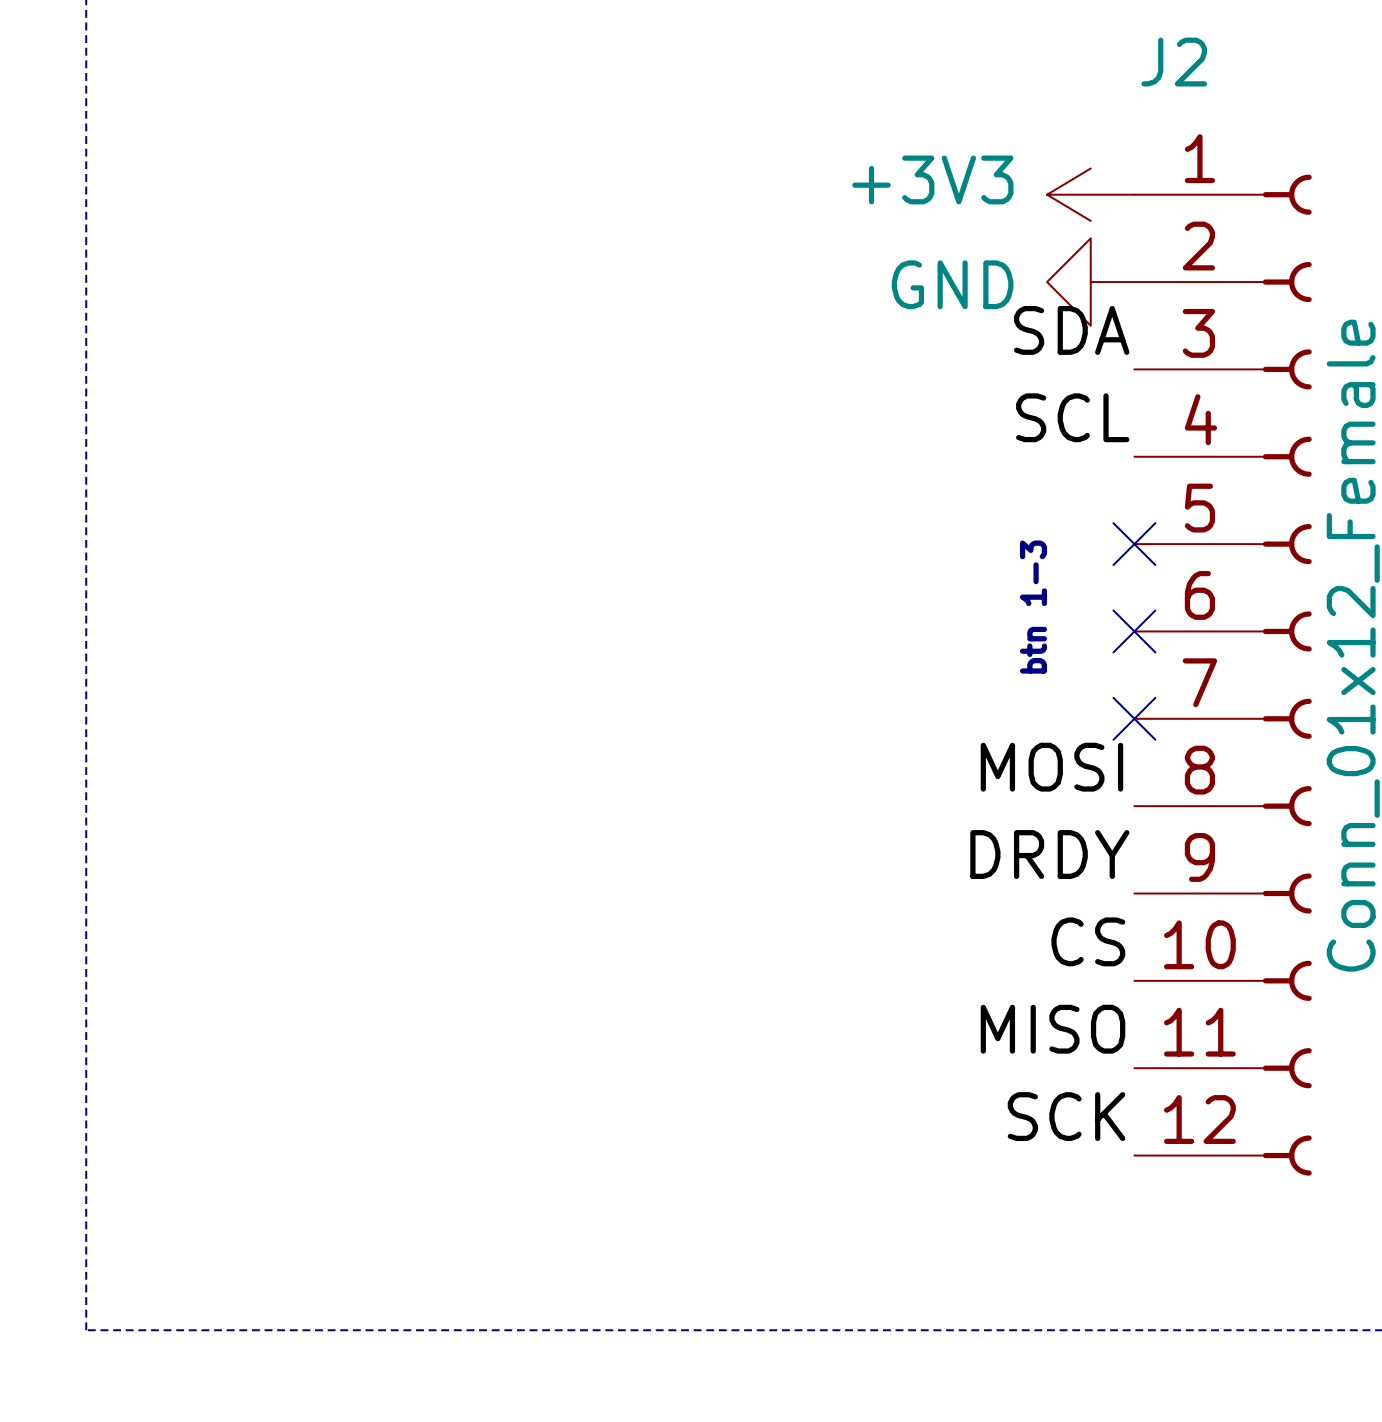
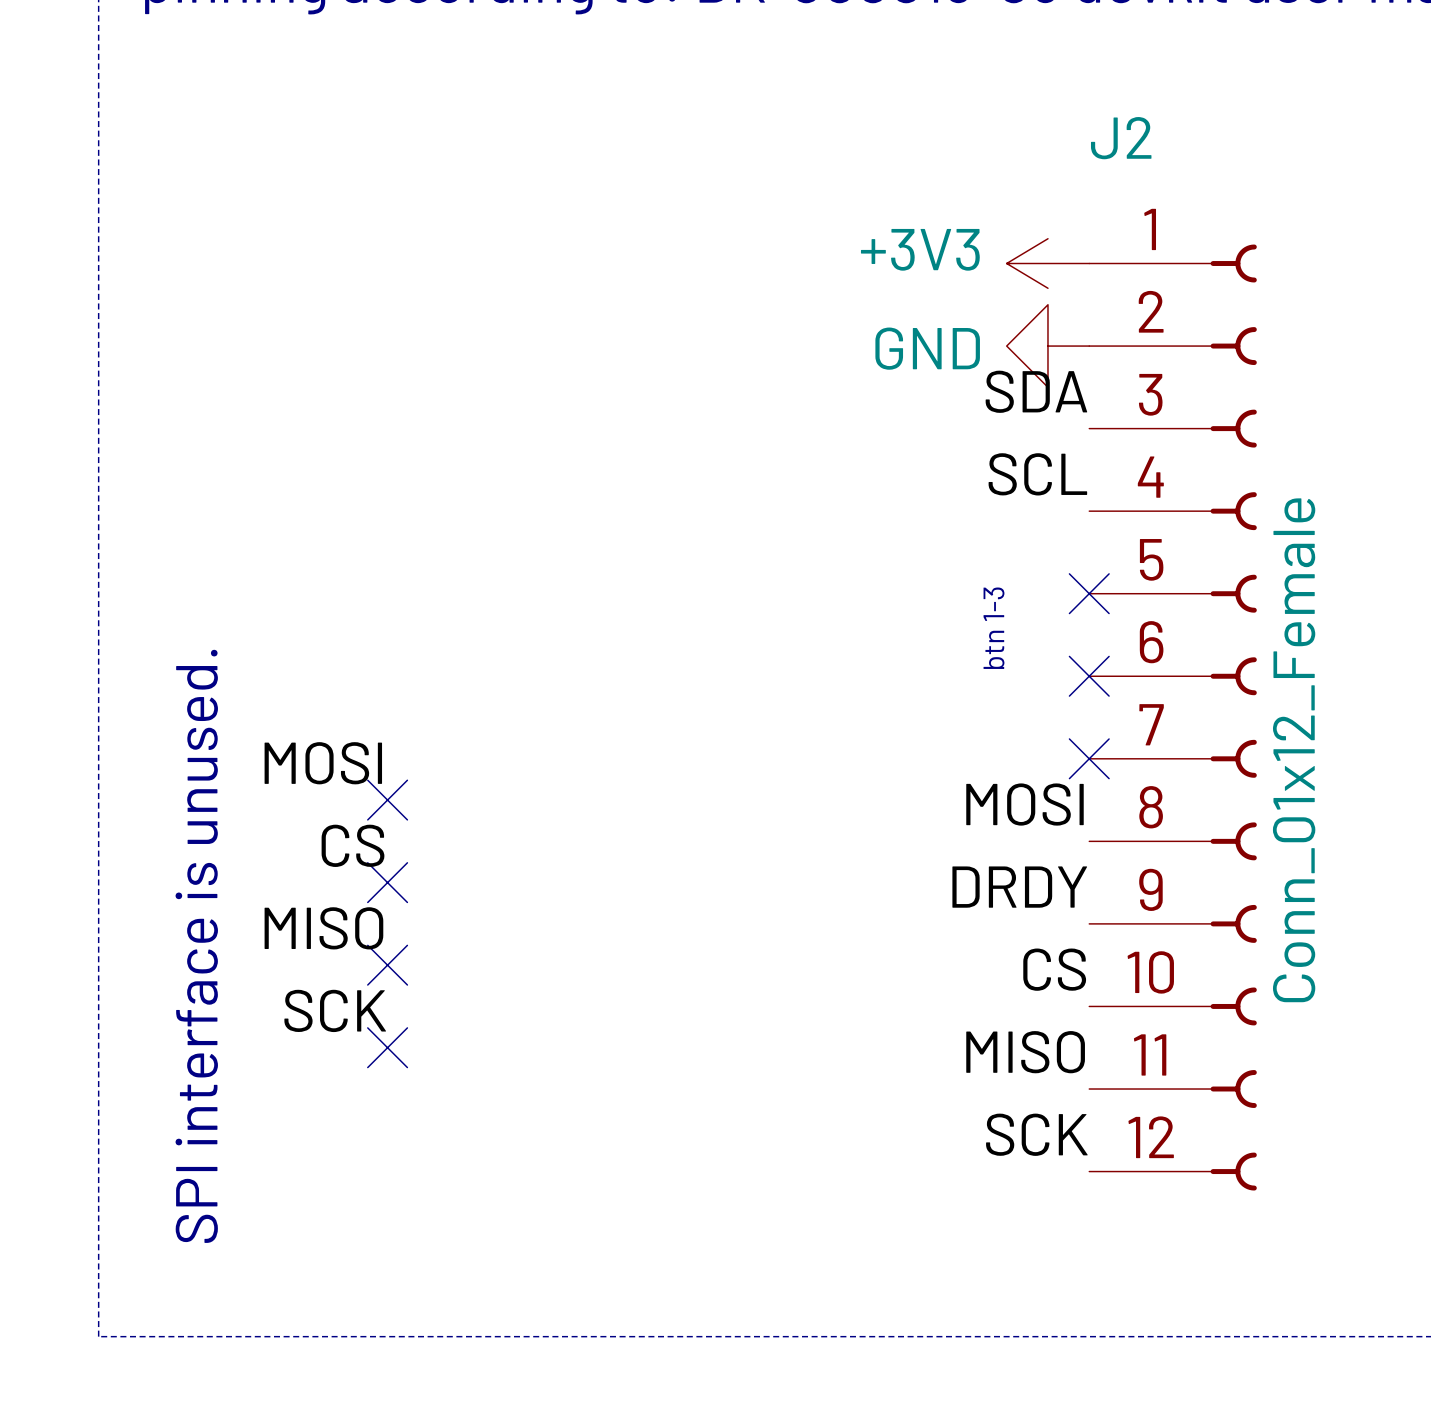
label: none -> MOSI (323, 763)
no-connect mark: none -> (387, 800)
label: none -> CS (353, 845)
text: none -> SPI interface is unused. (196, 946)
no-connect mark: none -> (387, 882)
label: none -> MISO (323, 928)
no-connect mark: none -> (387, 965)
label: none -> SCK (335, 1010)
no-connect mark: none -> (387, 1047)

